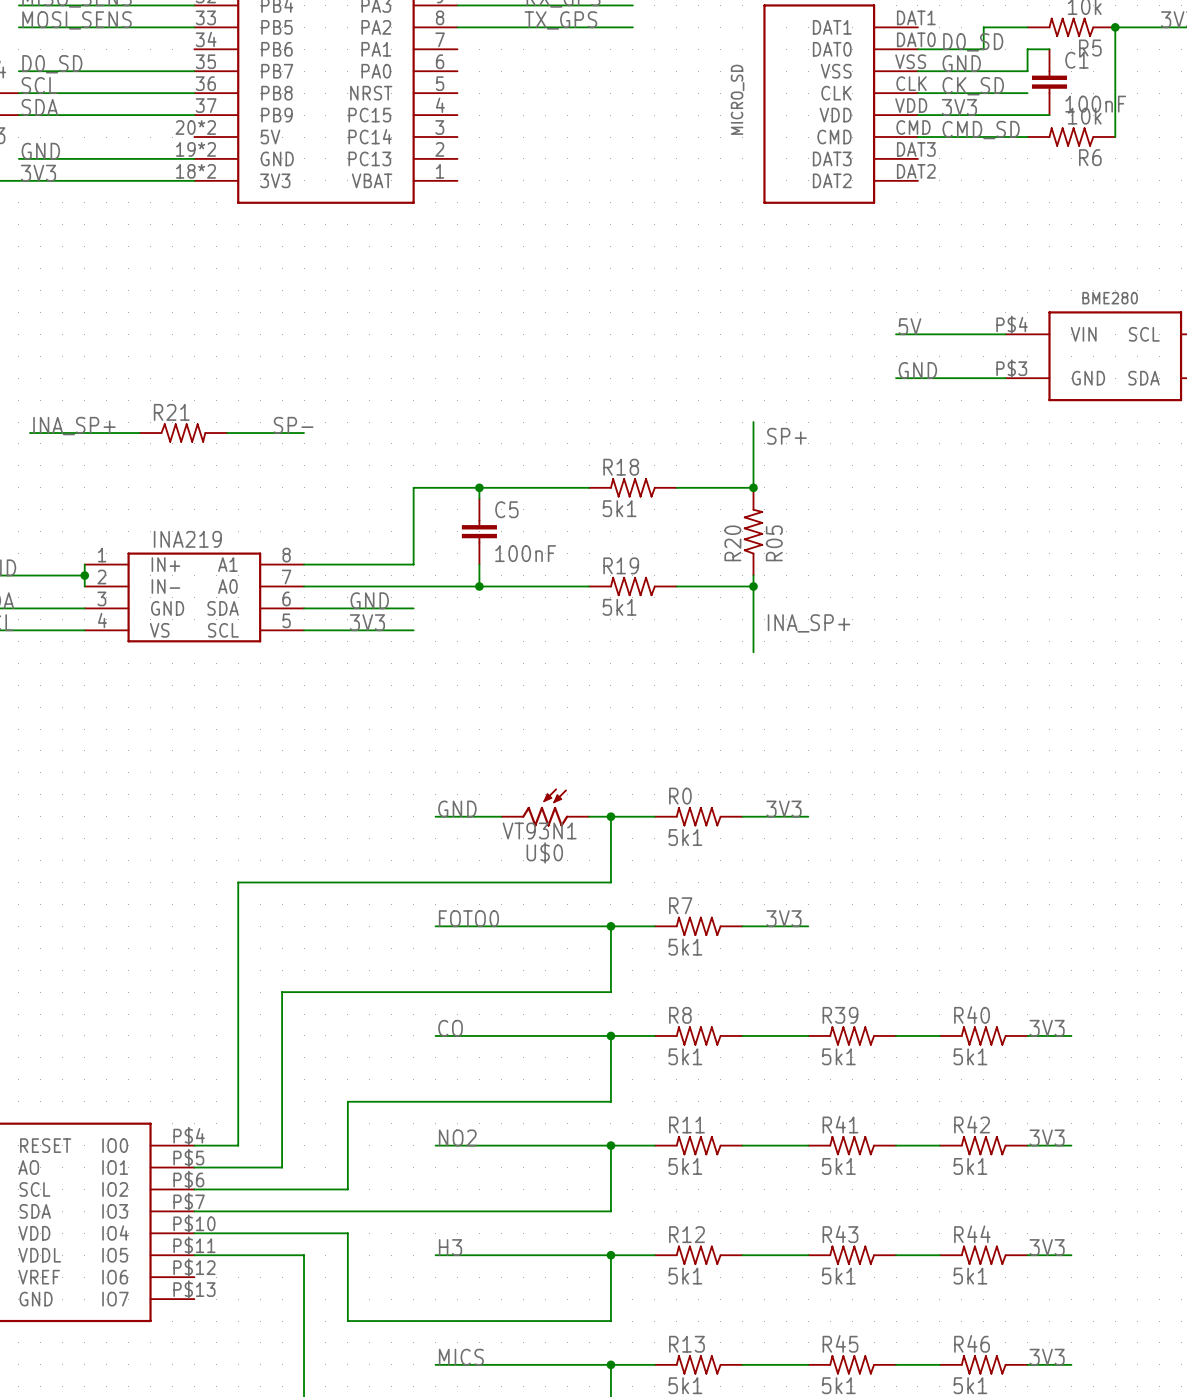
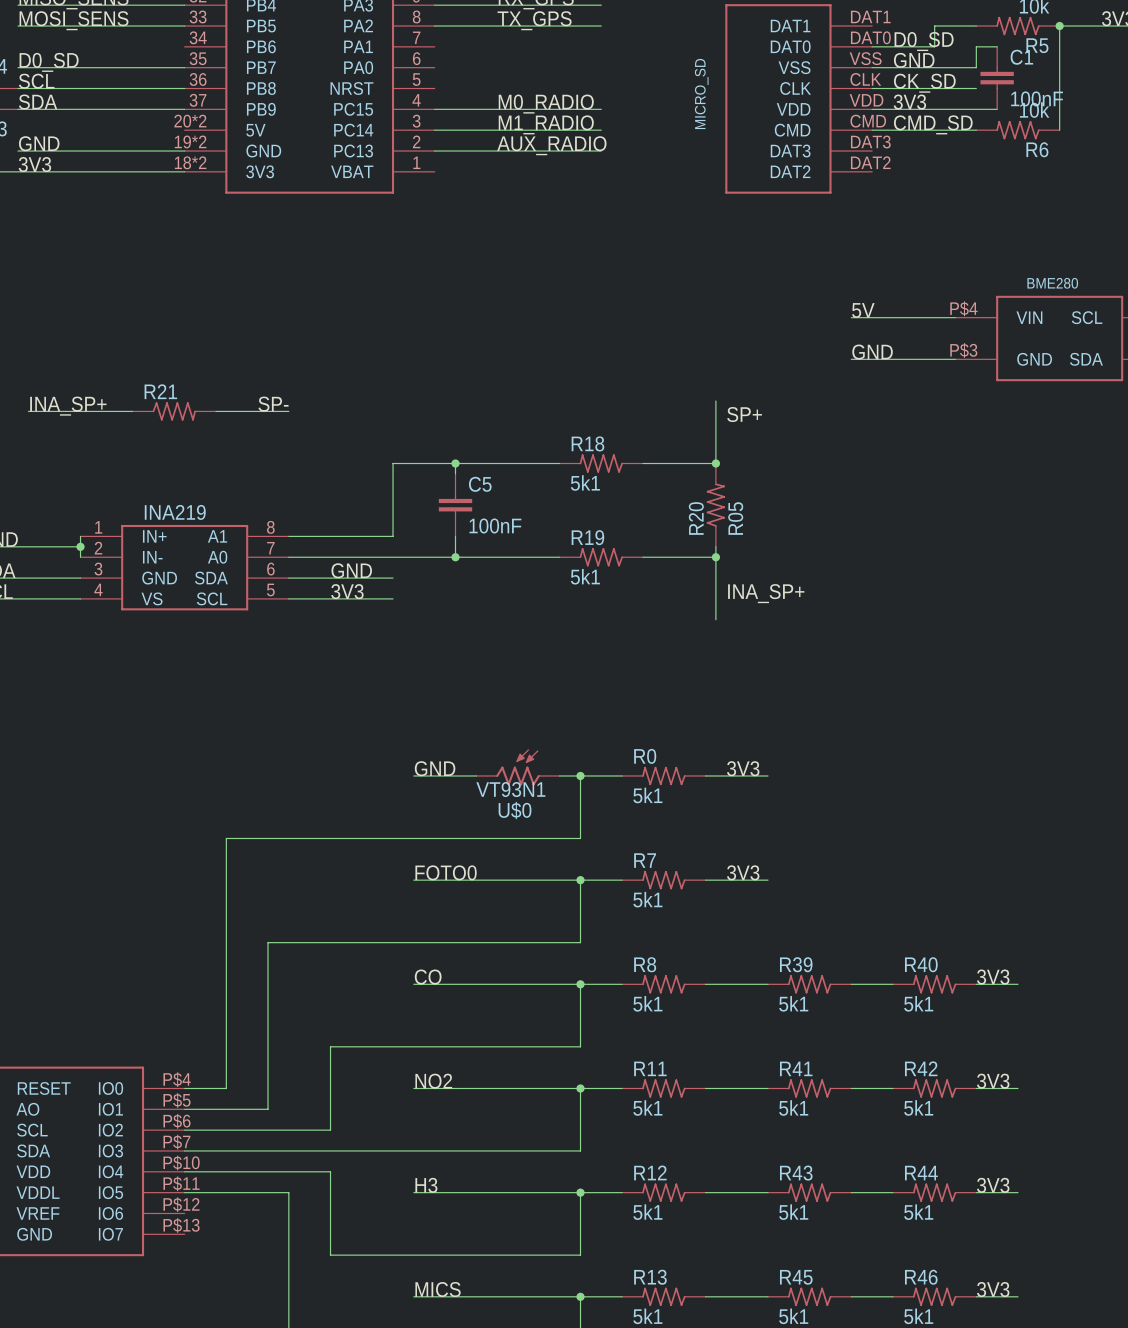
label: none -> M0_RADIO (546, 104)
wire: none -> (434, 109) (601, 109)
label: none -> M1_RADIO (546, 124)
wire: none -> (434, 130) (601, 130)
label: none -> AUX_RADIO (551, 145)
wire: none -> (434, 151) (601, 151)

